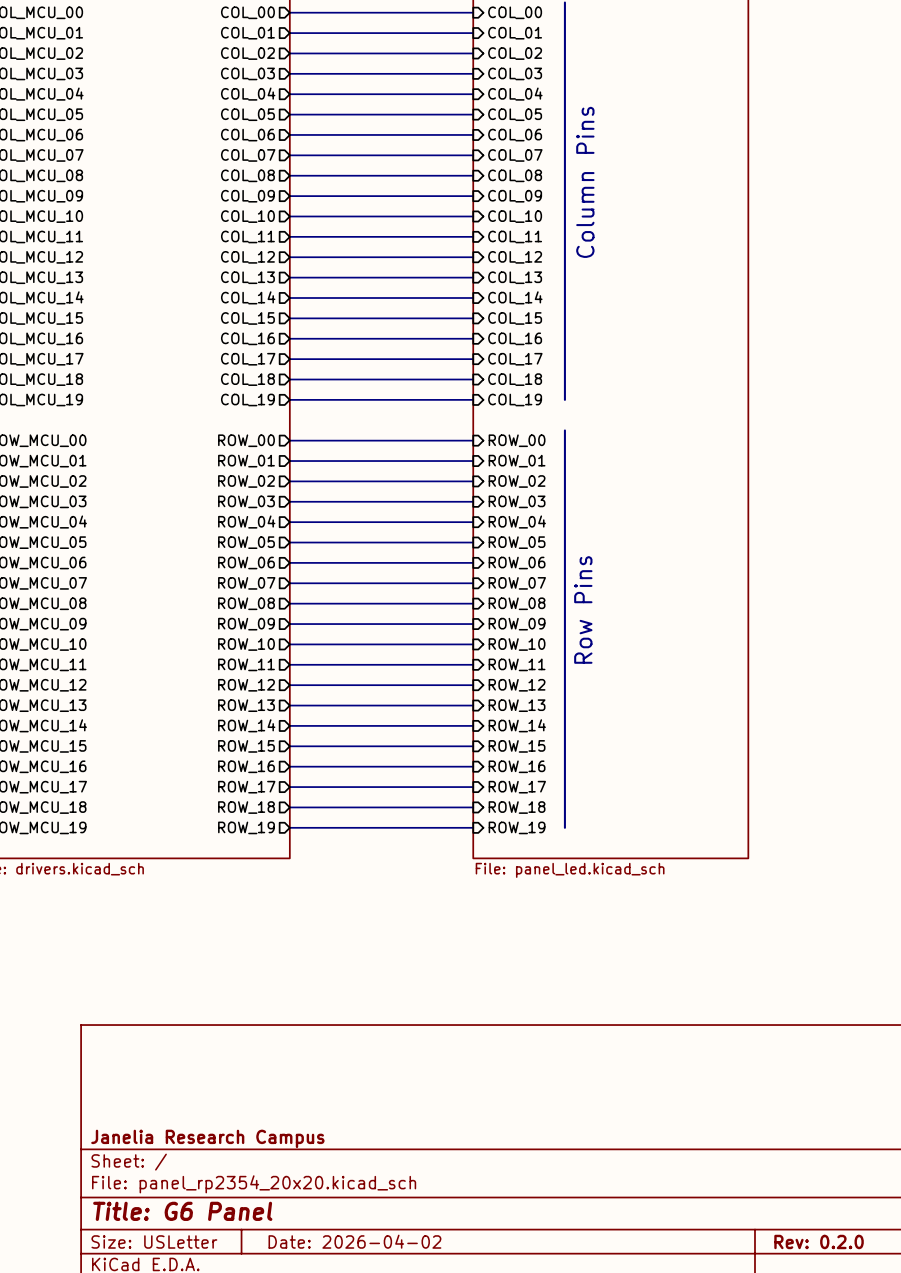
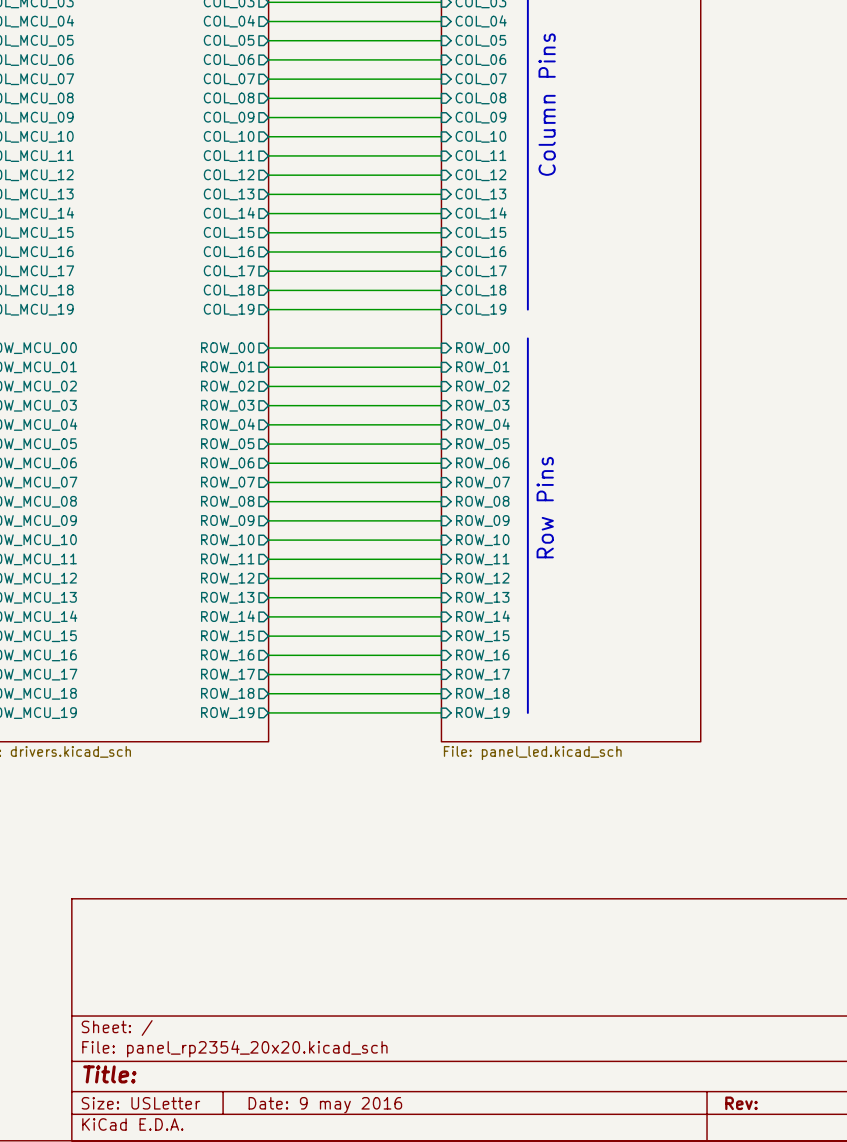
title block: Janelia Research Campus (207, 1138) -> none
title block: Title: G6 Panel (182, 1211) -> Title: (109, 1074)
title block: Date: 2026-04-02 (354, 1241) -> Date: 9 may 2016 (325, 1105)
title block: Rev: 0.2.0 (819, 1241) -> Rev: (741, 1103)

